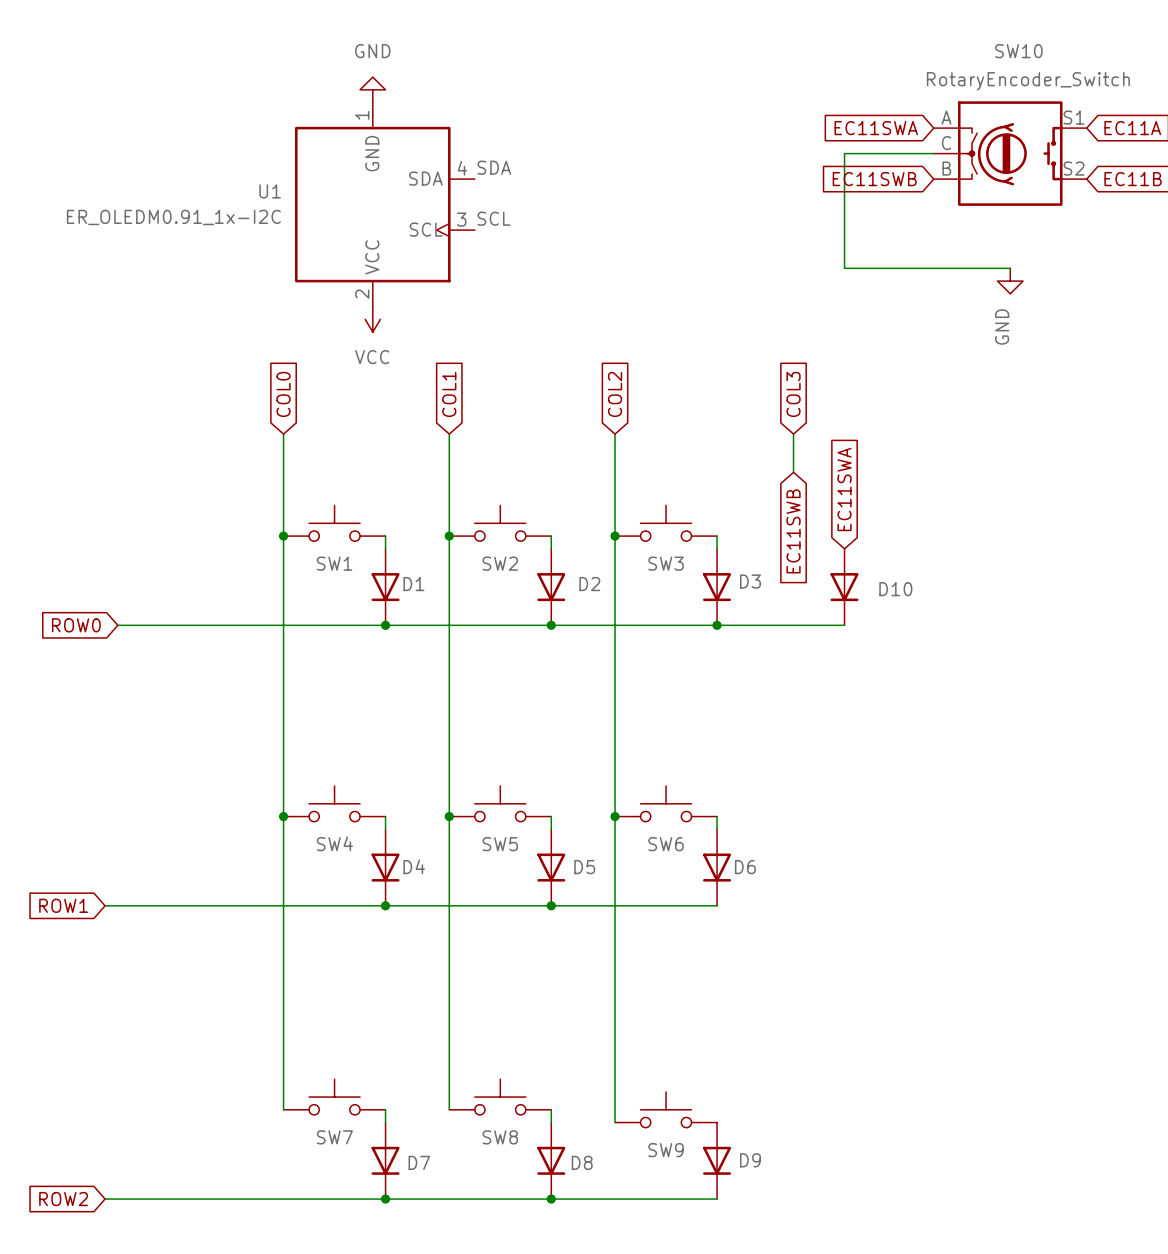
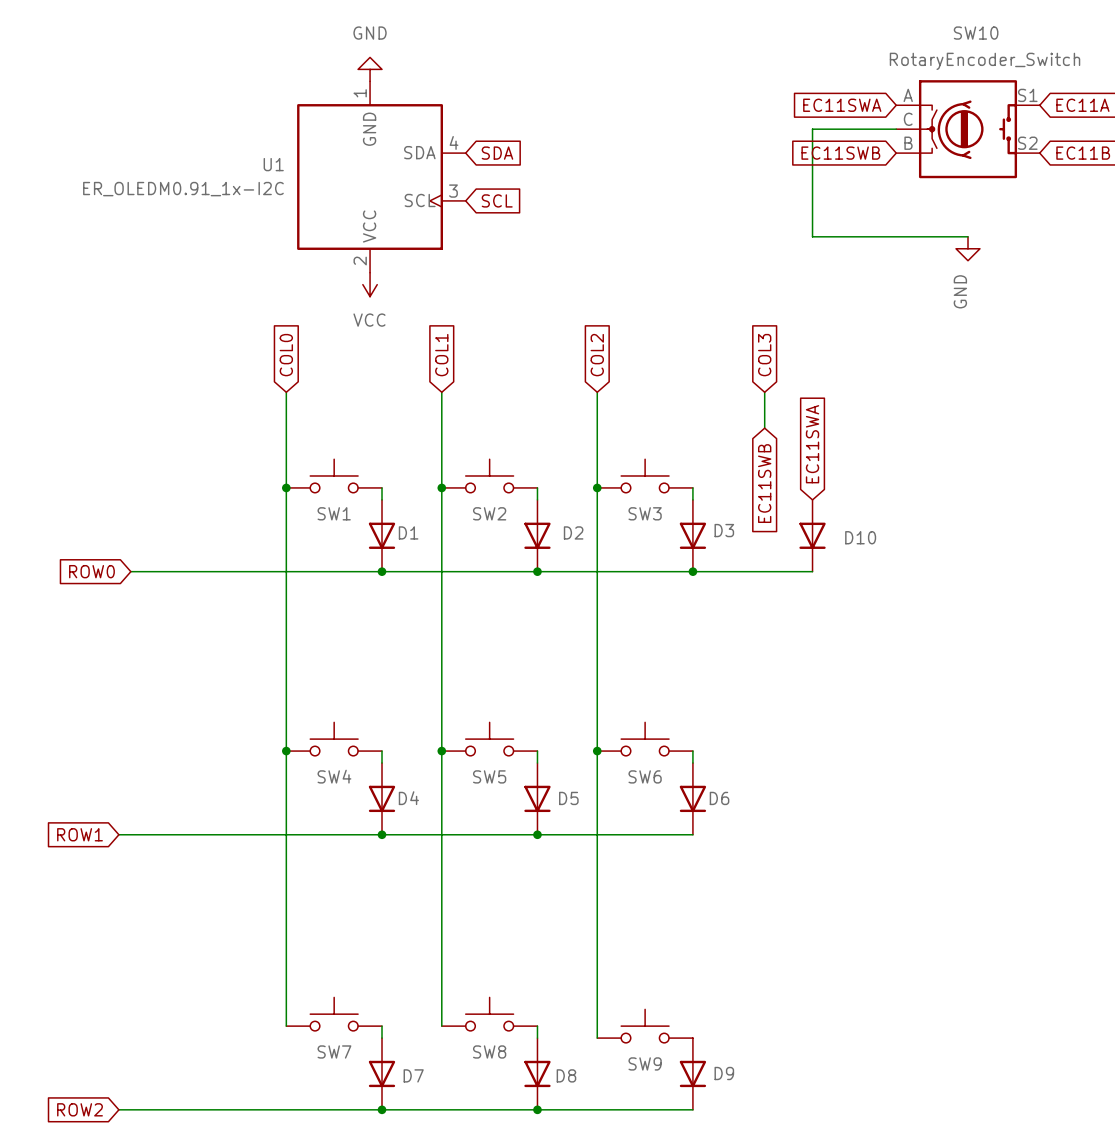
label: SDA (494, 167) -> none
global label: none -> SDA (497, 153)
label: SCL (494, 218) -> none
global label: none -> SCL (497, 200)

